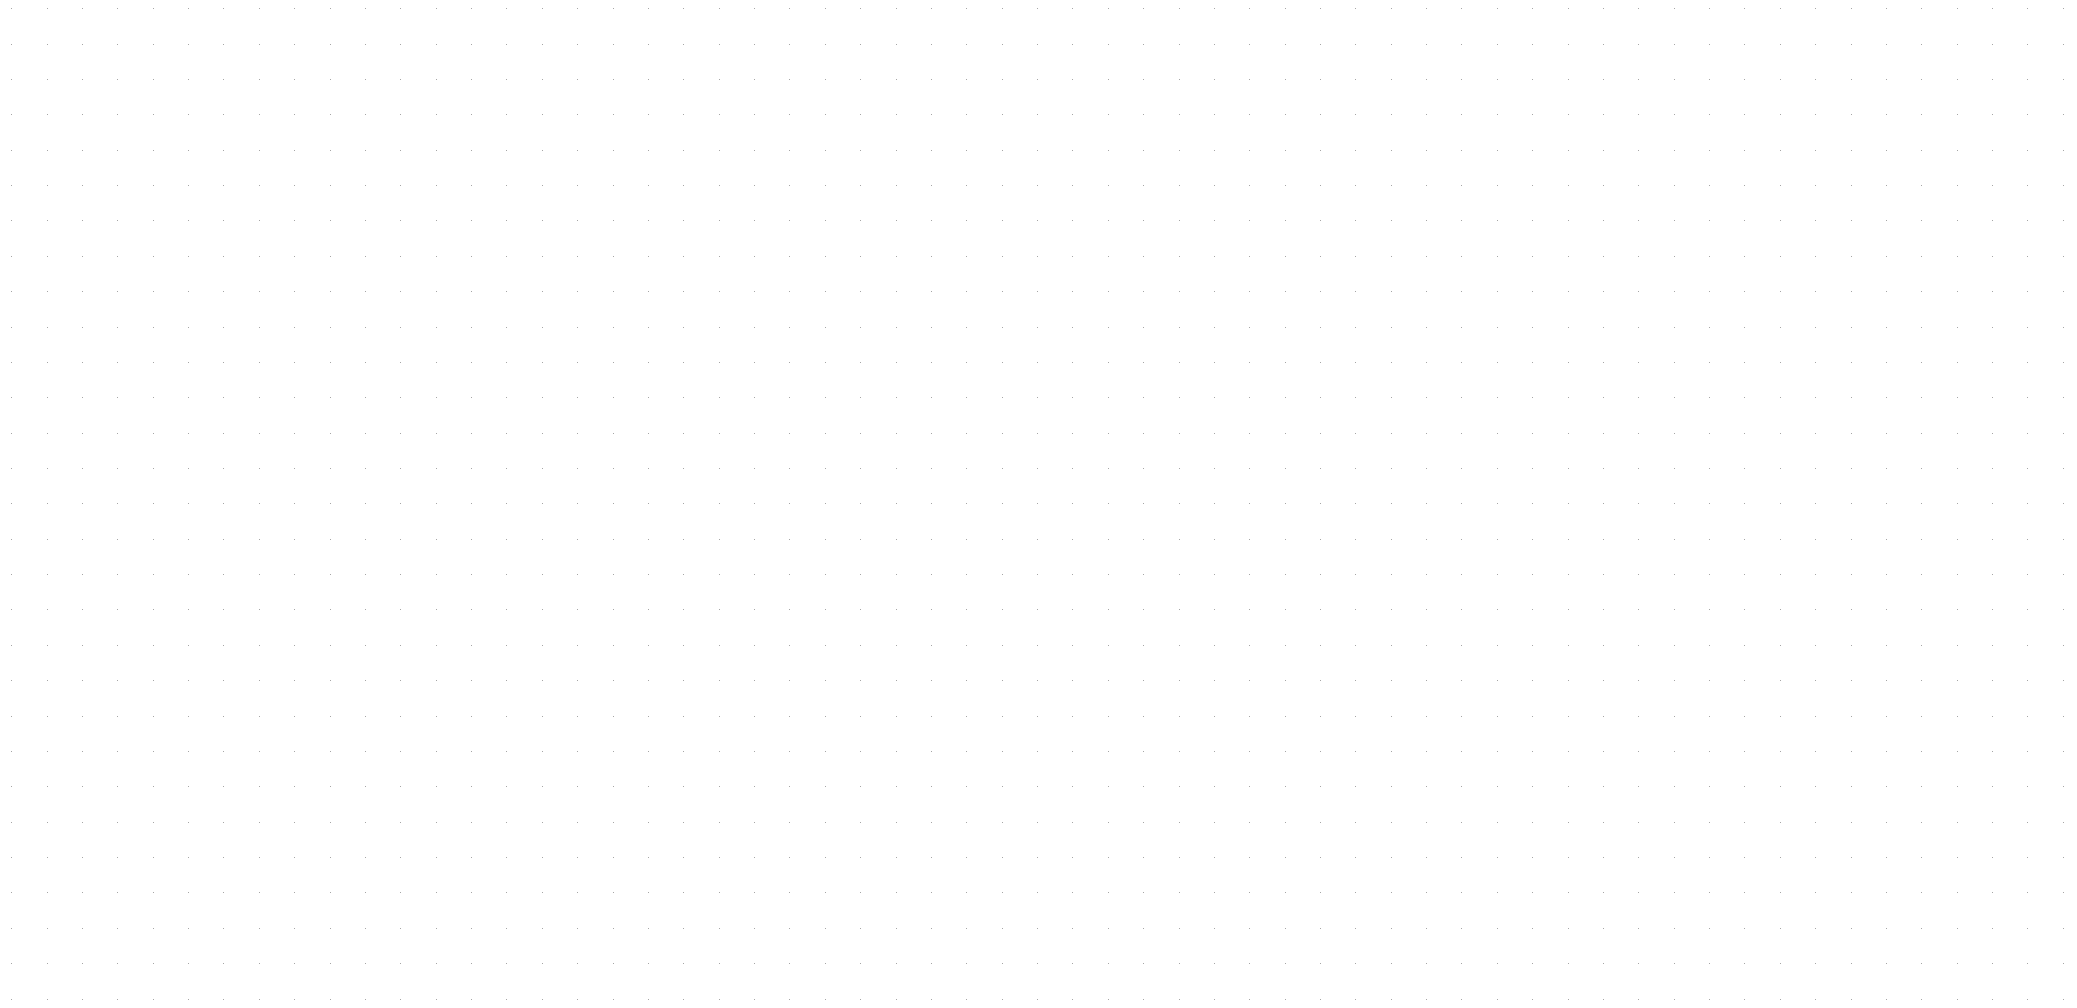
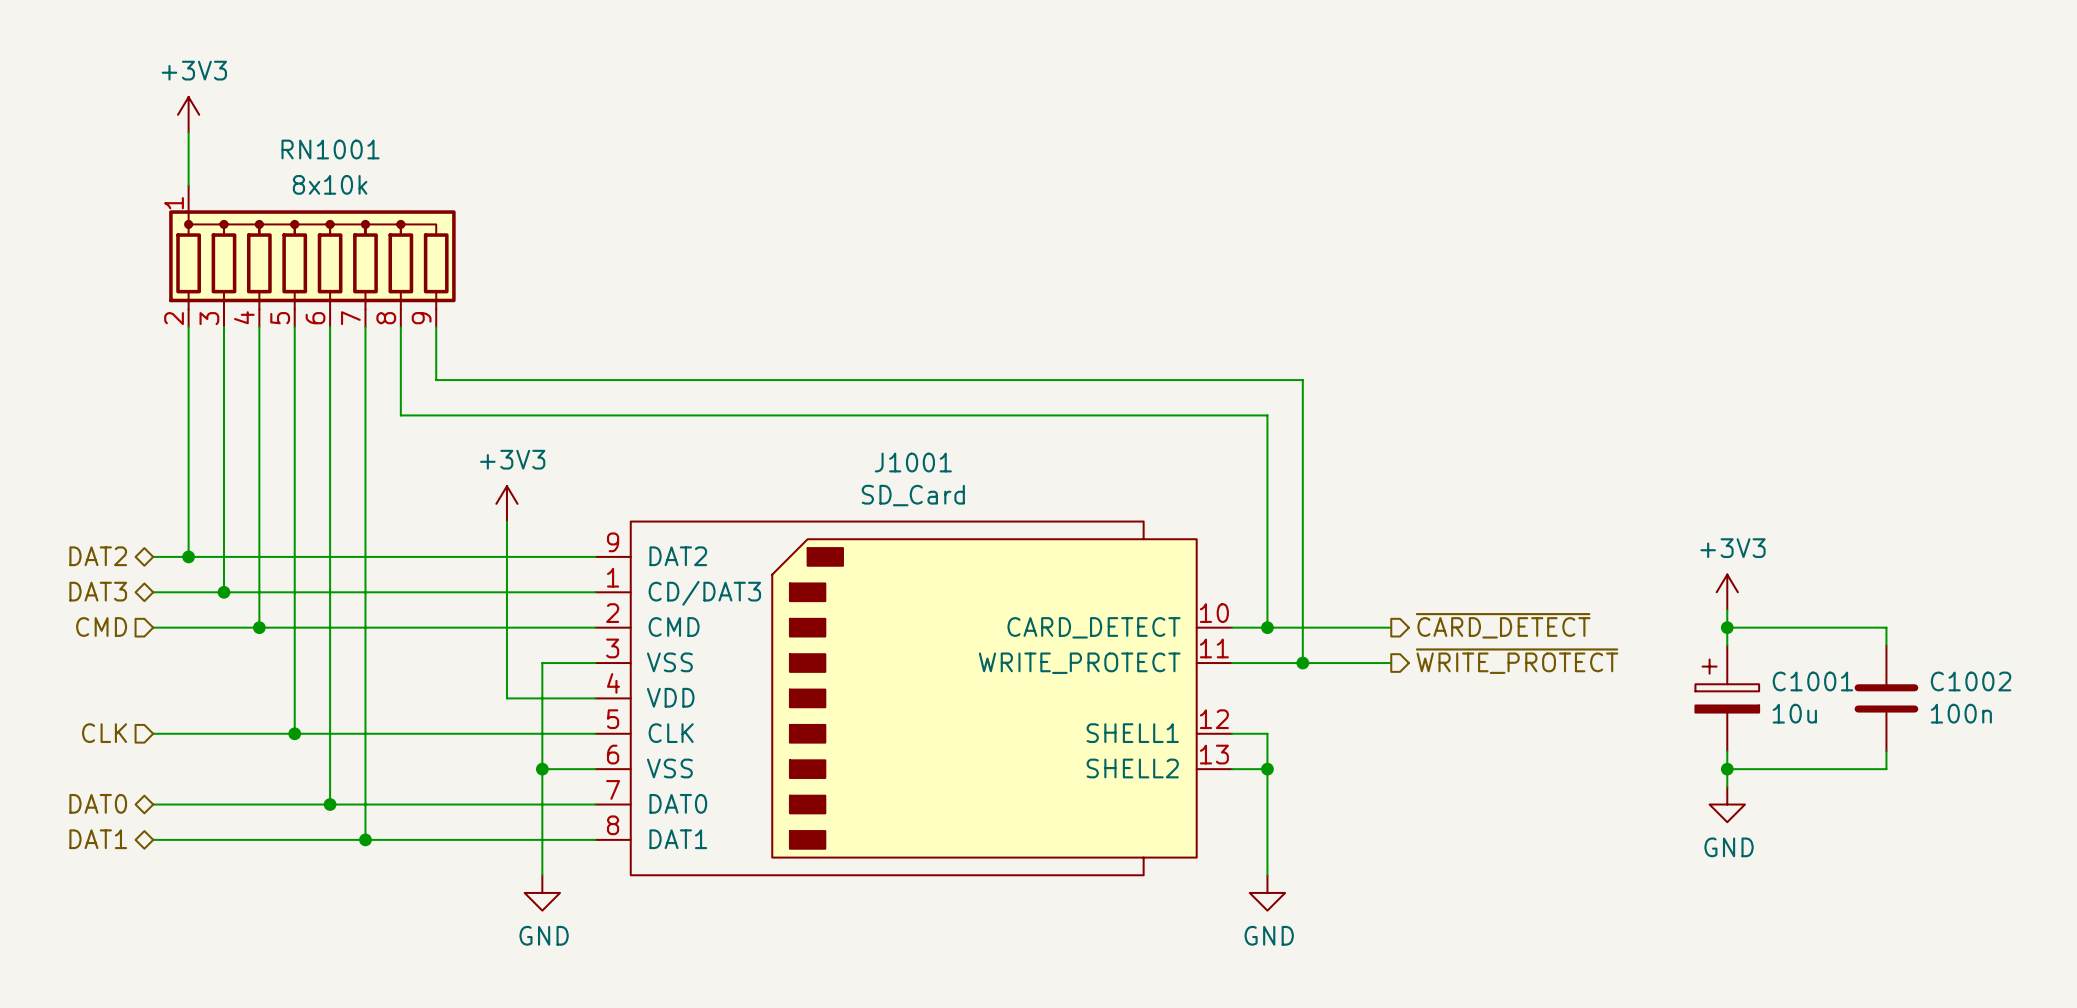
power symbol: none -> +3V3 (188, 114)
wire: none -> (188, 132) (188, 185)
RN1001: none -> 8x10k (312, 256)
wire: none -> (188, 327) (188, 556)
wire: none -> (223, 327) (223, 592)
wire: none -> (259, 327) (259, 627)
wire: none -> (294, 327) (294, 733)
wire: none -> (330, 327) (330, 804)
wire: none -> (365, 327) (365, 839)
wire: none -> (400, 327) (400, 415) (1267, 415) (1267, 627)
wire: none -> (436, 327) (436, 380) (1302, 380) (1302, 663)
power symbol: none -> +3V3 (506, 503)
wire: none -> (506, 521) (506, 698) (595, 698)
hierarchical label: none -> DAT2 (98, 556)
wire: none -> (153, 556) (595, 556)
junction: none -> (188, 556)
hierarchical label: none -> DAT3 (98, 591)
wire: none -> (153, 592) (595, 592)
junction: none -> (223, 592)
power symbol: none -> +3V3 (1727, 592)
wire: none -> (1727, 609) (1727, 645)
hierarchical label: none -> CMD (101, 627)
wire: none -> (153, 627) (595, 627)
junction: none -> (259, 627)
wire: none -> (1232, 627) (1391, 627)
junction: none -> (1267, 627)
hierarchical label: none -> ~{CARD_DETECT} (1503, 625)
wire: none -> (1727, 627) (1886, 627) (1886, 645)
junction: none -> (1727, 627)
hierarchical label: none -> ~{WRITE_PROTECT} (1517, 661)
wire: none -> (595, 663) (542, 663) (542, 875)
wire: none -> (1232, 663) (1391, 663)
junction: none -> (1302, 663)
J1001: none -> SD_Card (913, 698)
C1001: none -> 10u (1727, 698)
C1002: none -> 100n (1886, 698)
hierarchical label: none -> CLK (104, 733)
wire: none -> (153, 733) (595, 733)
junction: none -> (294, 733)
wire: none -> (1232, 733) (1267, 733) (1267, 875)
wire: none -> (1727, 751) (1727, 786)
wire: none -> (1886, 751) (1886, 769) (1727, 769)
wire: none -> (542, 769) (595, 769)
junction: none -> (542, 769)
wire: none -> (1232, 769) (1267, 769)
junction: none -> (1267, 769)
junction: none -> (1727, 769)
hierarchical label: none -> DAT0 (98, 803)
wire: none -> (153, 804) (595, 804)
junction: none -> (330, 804)
power symbol: none -> GND (1727, 804)
hierarchical label: none -> DAT1 (98, 839)
wire: none -> (153, 839) (595, 839)
junction: none -> (365, 839)
power symbol: none -> GND (542, 892)
power symbol: none -> GND (1267, 892)

